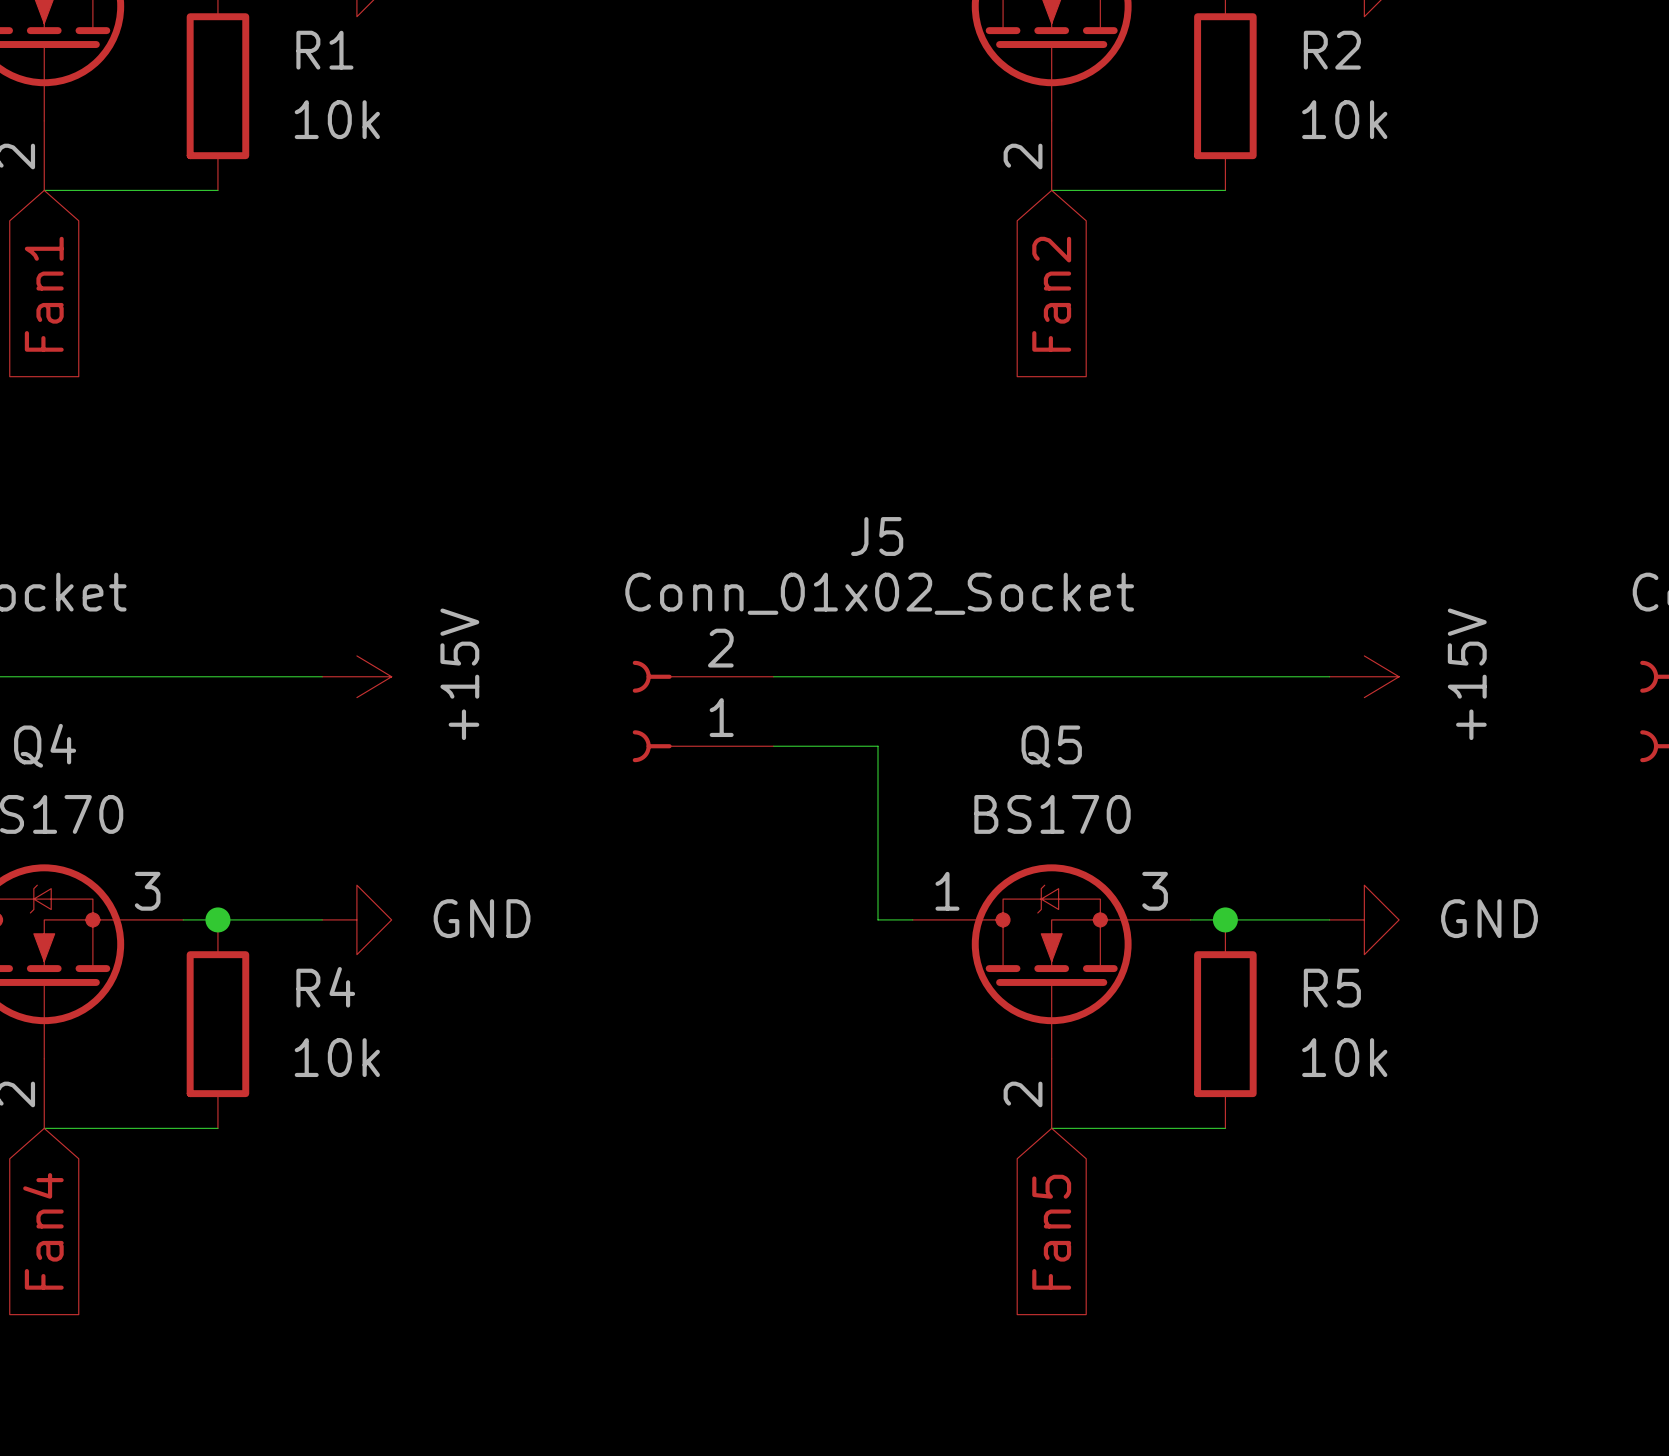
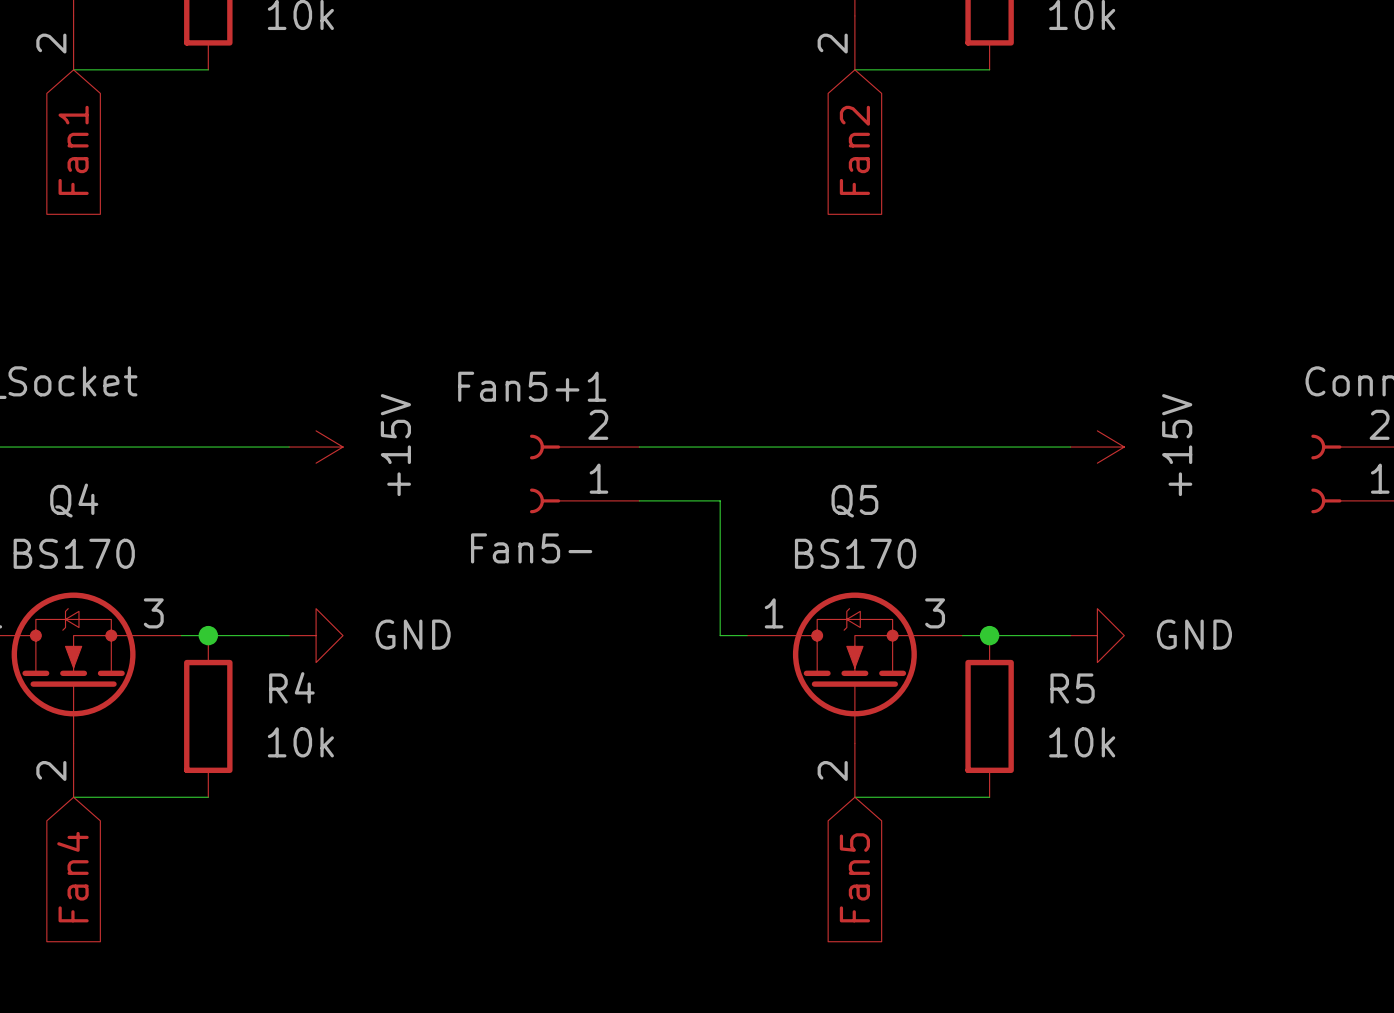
J5 name: J5 (877, 536) -> Fan5+1 (532, 386)
J5 value: Conn_01x02_Socket (879, 593) -> Fan5- (531, 548)

